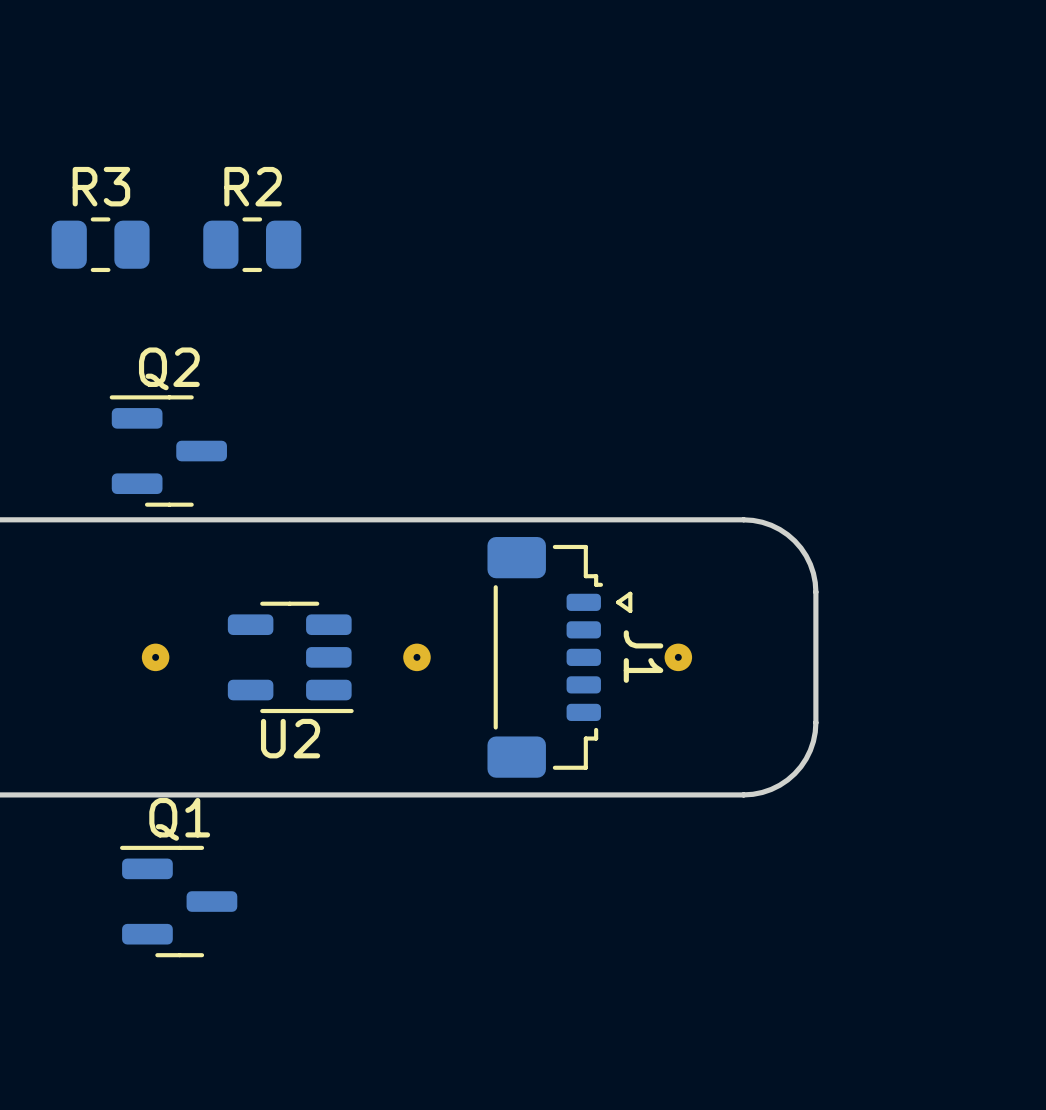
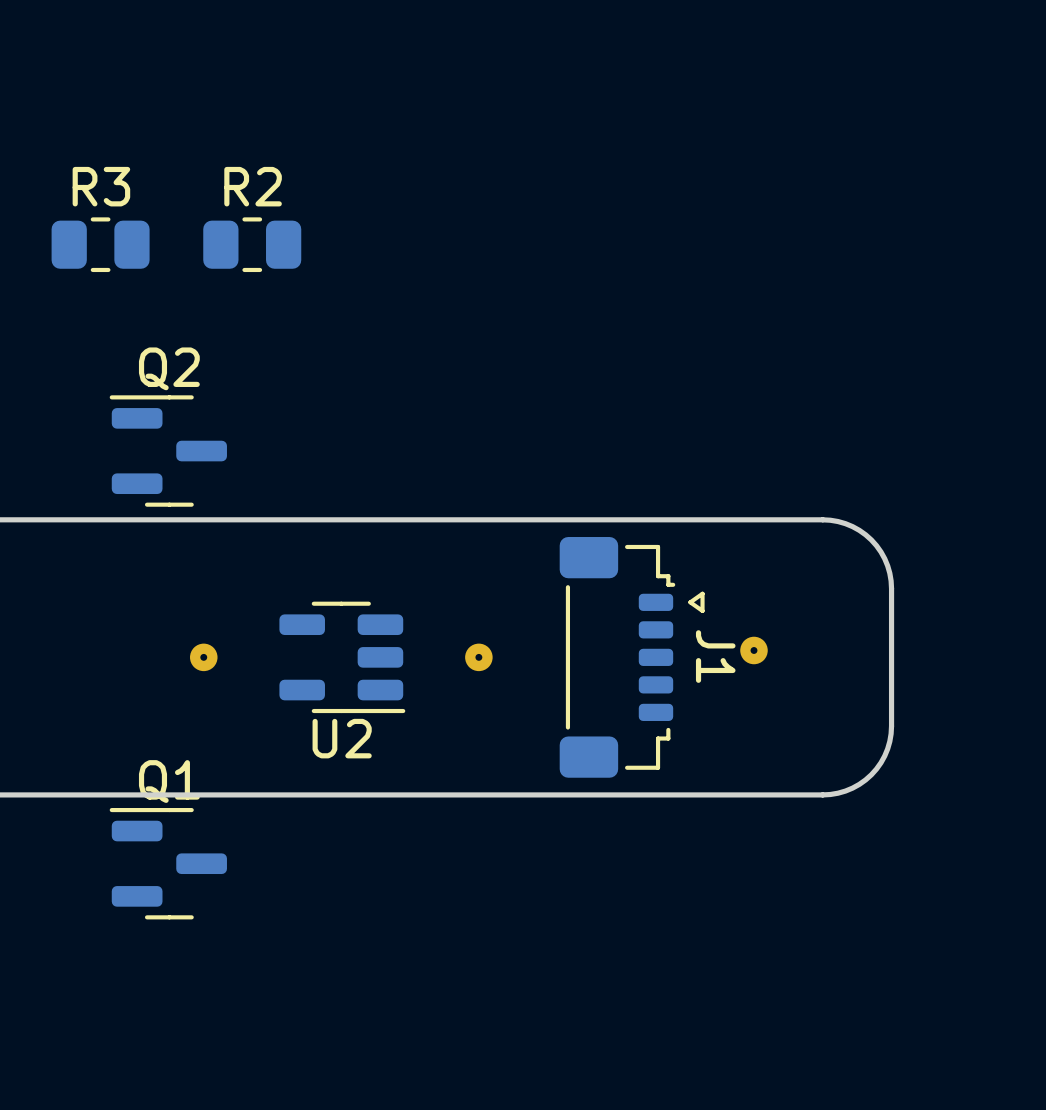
board edge: (743, 519) (771, 525) (794, 540) (810, 564) (815, 592) (815, 722) (810, 750) (794, 773) (779, 785) (762, 792) (743, 794) -> (743, 519) (830, 520) (852, 526) (871, 539) (881, 551) (889, 573) (891, 588) (891, 733) (884, 755) (876, 769) (859, 784) (838, 793) (743, 794)
part position: (155, 657) -> (203, 657)
U2 position: (290, 657) -> (342, 657)
part position: (416, 657) -> (478, 657)
J1 position: (559, 657) -> (632, 657)
part position: (678, 657) -> (753, 650)
Q1 position: (178, 901) -> (168, 863)

